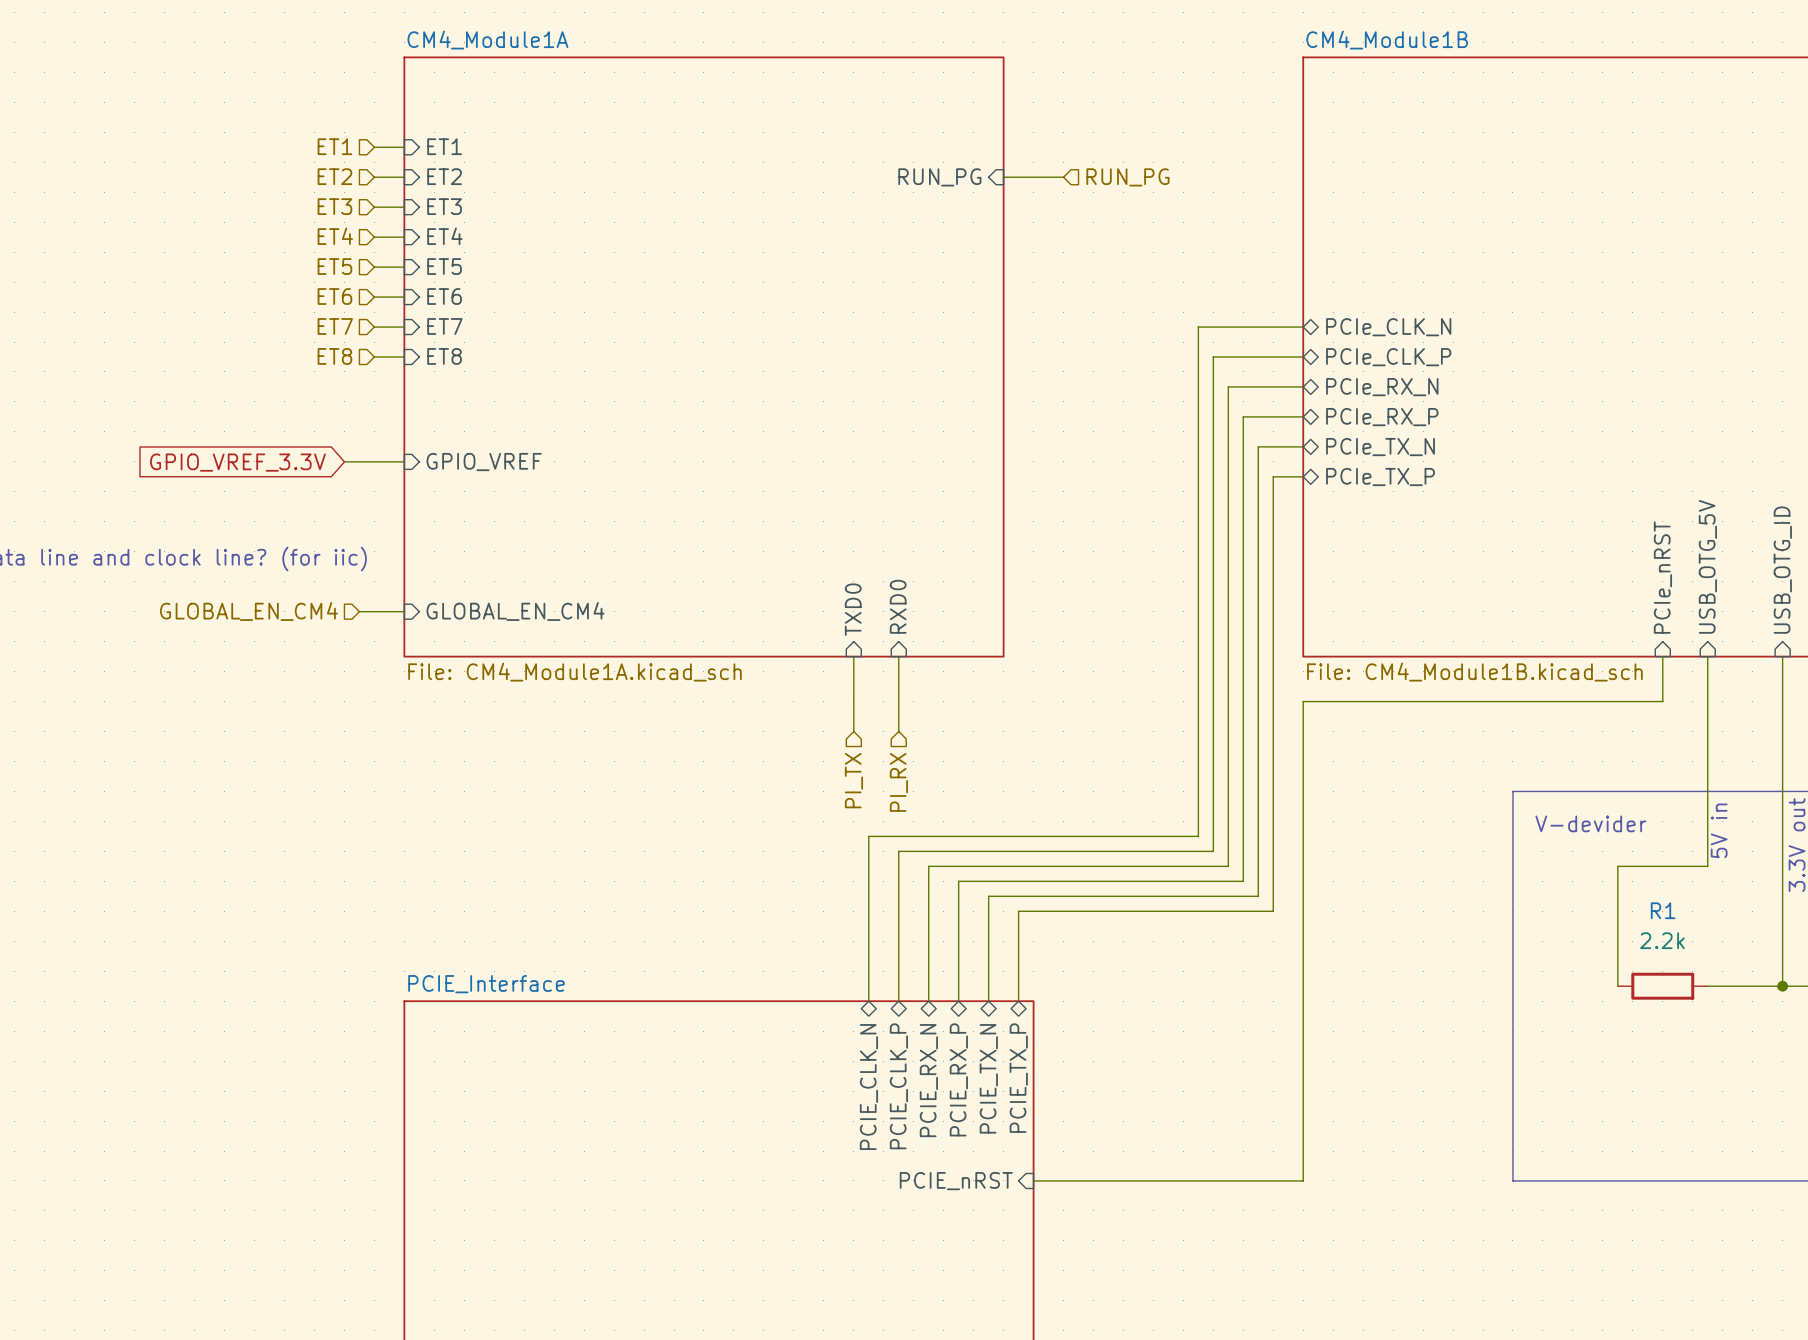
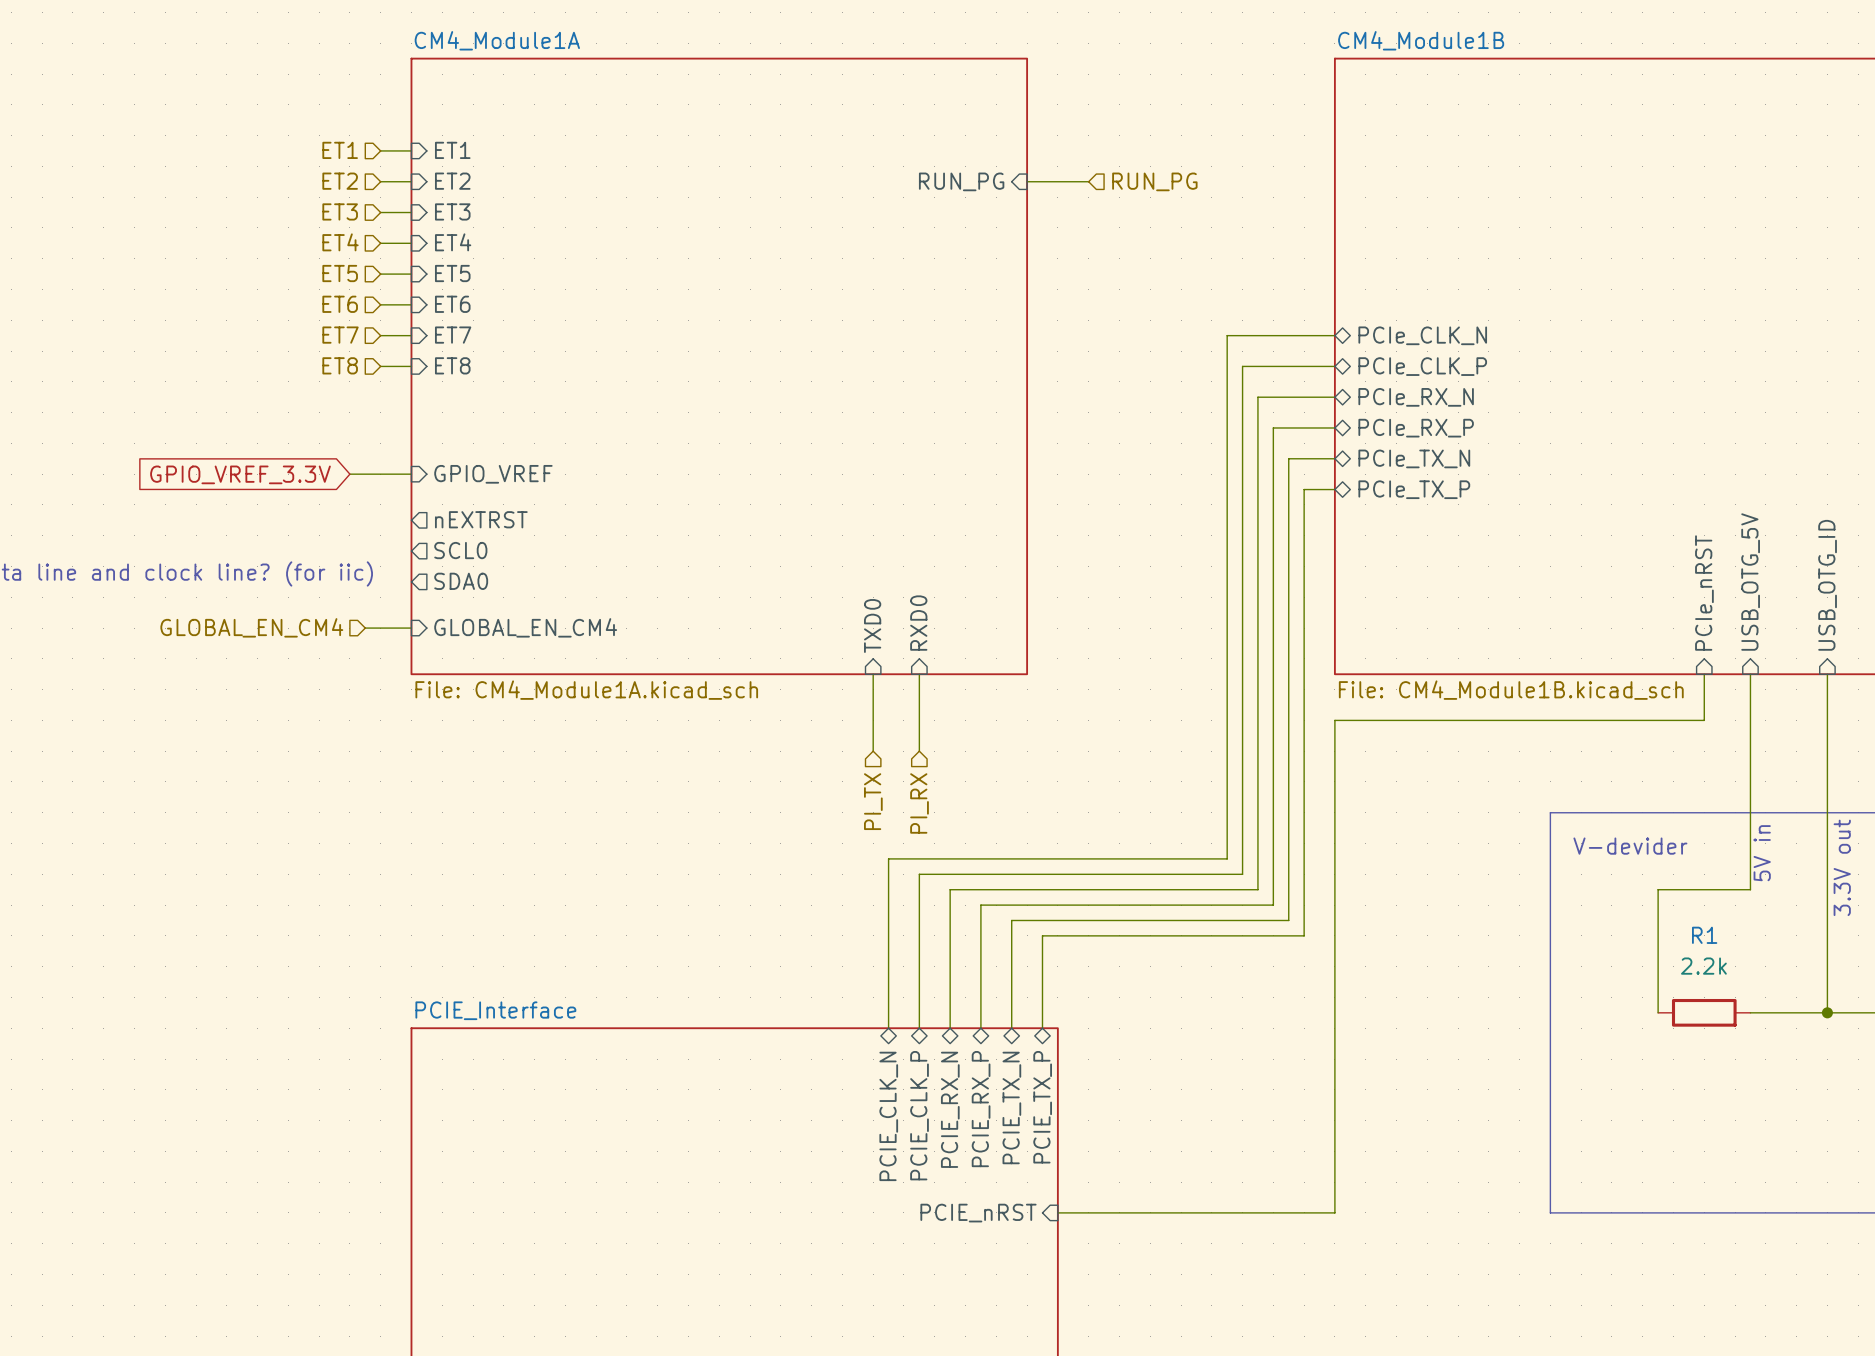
sheet pin: none -> nEXTRST (481, 519)
sheet pin: none -> SCL0 (460, 550)
sheet pin: none -> SDA0 (461, 581)

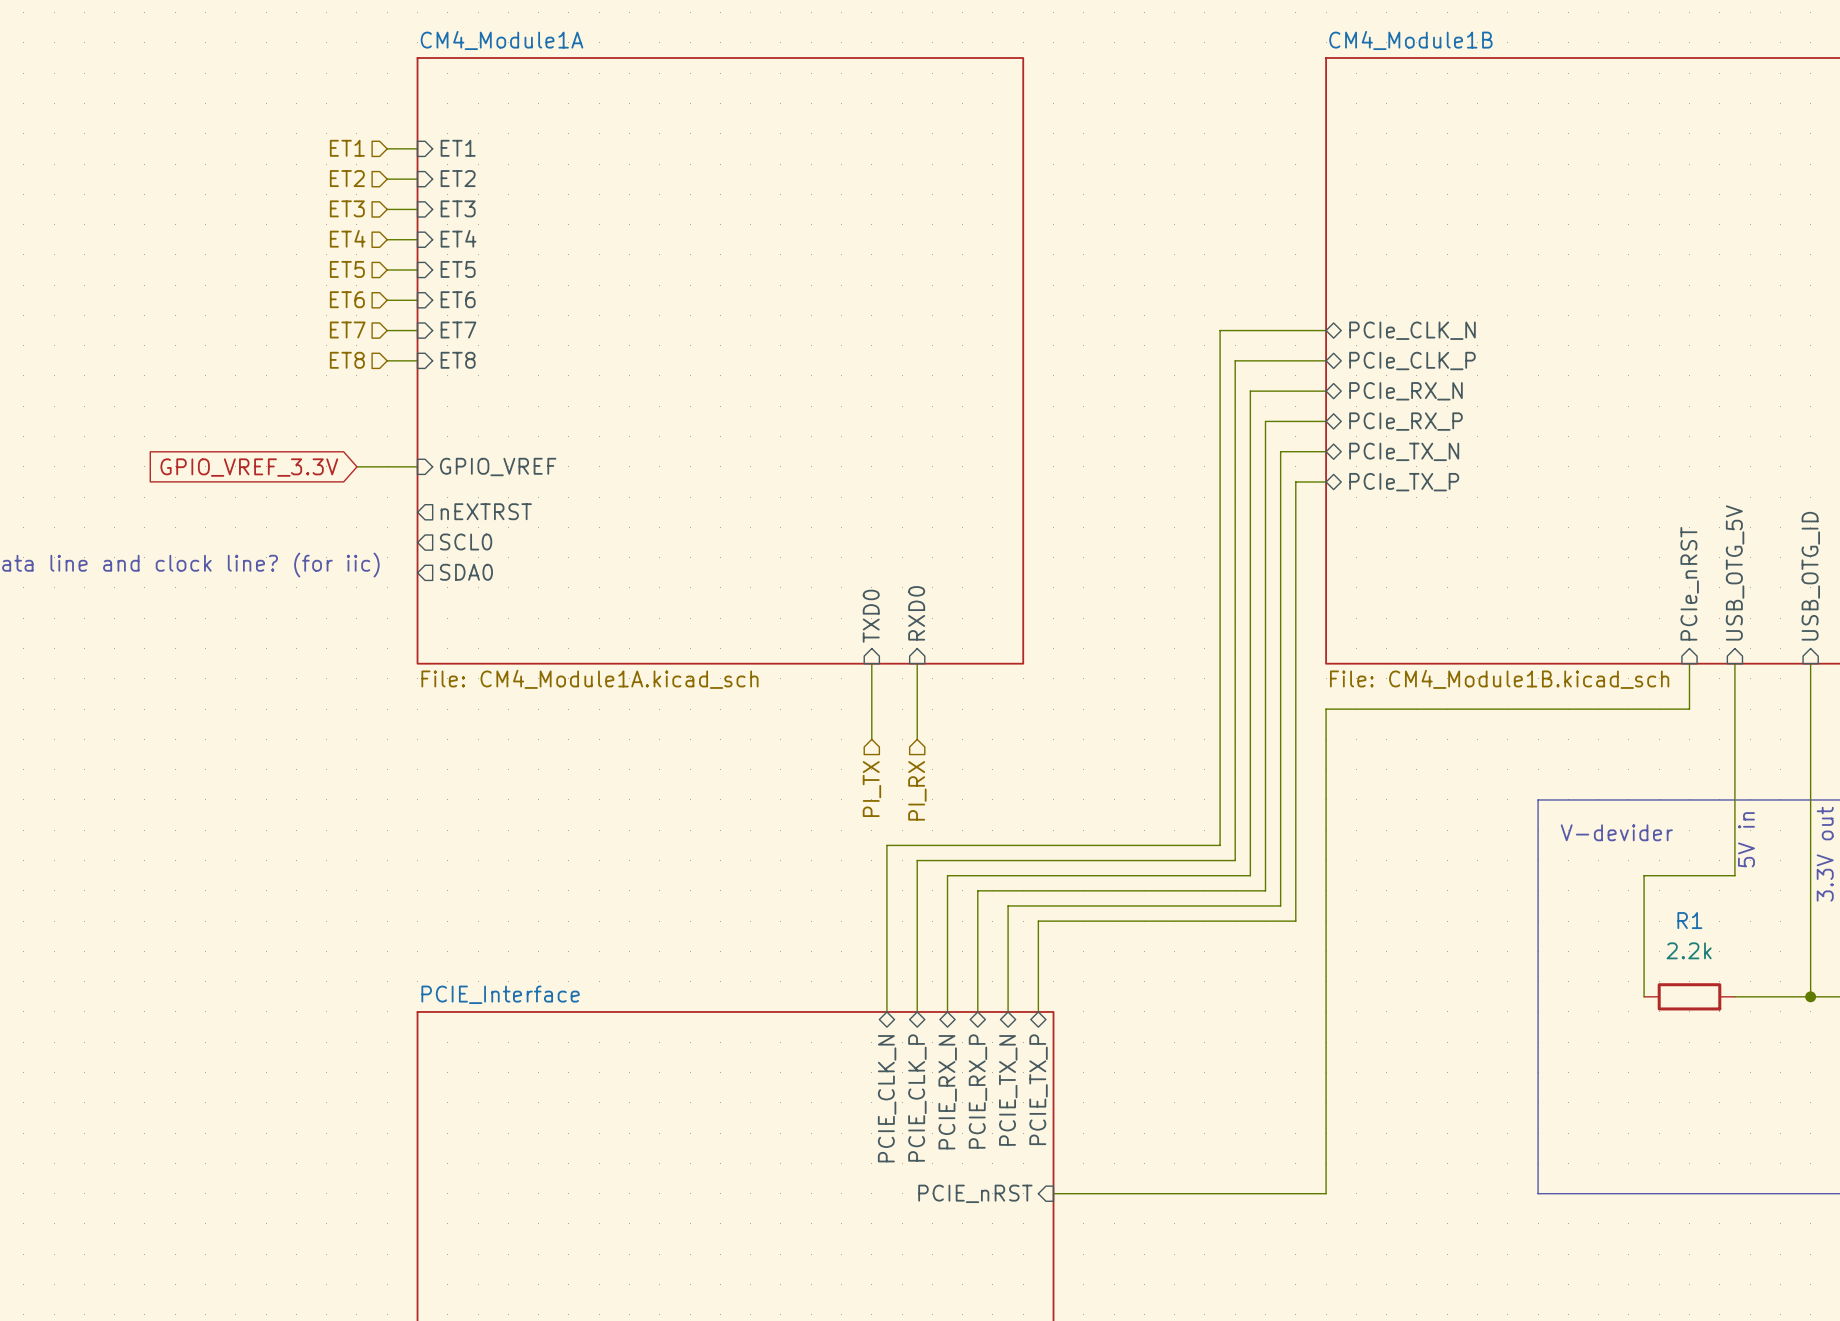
sheet pin: RUN_PG (961, 181) -> none
wire: (1027, 181) (1088, 181) -> none
hierarchical label: RUN_PG (1154, 181) -> none
hierarchical label: GLOBAL_EN_CM4 (251, 627) -> none
sheet pin: GLOBAL_EN_CM4 (525, 627) -> none
wire: (365, 628) (411, 628) -> none

